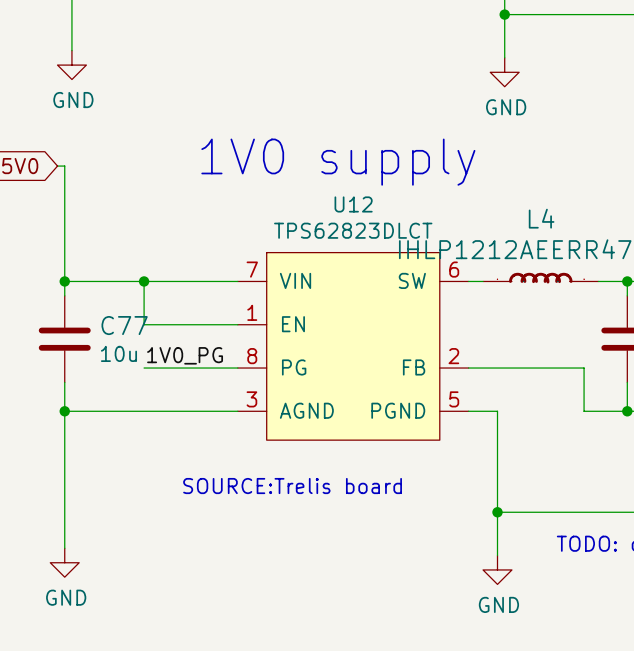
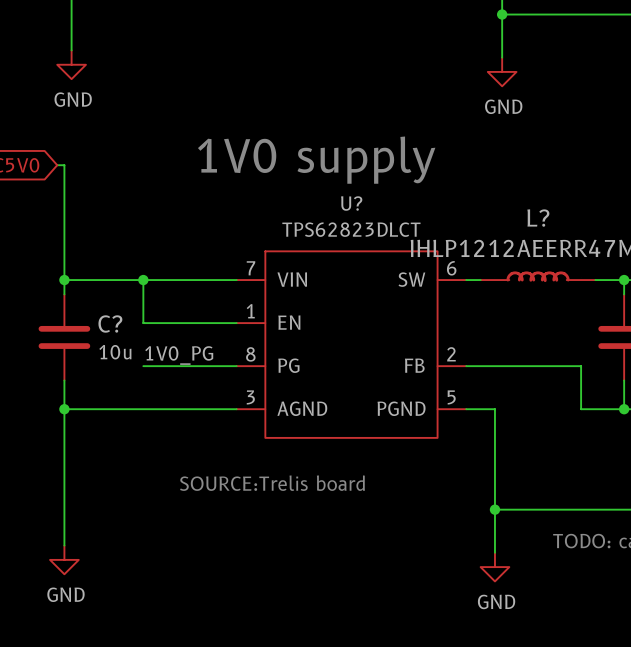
U12 name: U12 (353, 204) -> U? (351, 203)
L4 name: L4 (541, 218) -> L? (538, 218)
C77 name: C77 (124, 325) -> C? (110, 324)

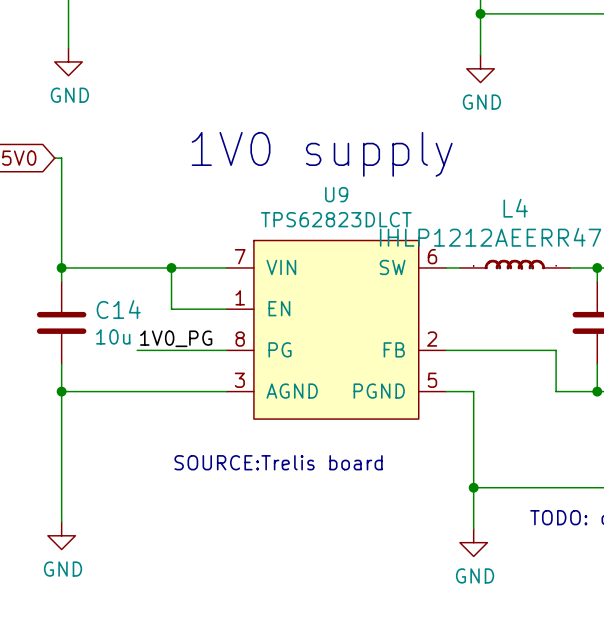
U? name: U? (351, 203) -> U9 (336, 194)
L? name: L? (538, 218) -> L4 (515, 208)
wire: (143, 280) (143, 323) (179, 323) -> (171, 267) (171, 309)
junction position: (143, 280) -> (171, 267)
C? name: C? (110, 324) -> C14 (118, 309)

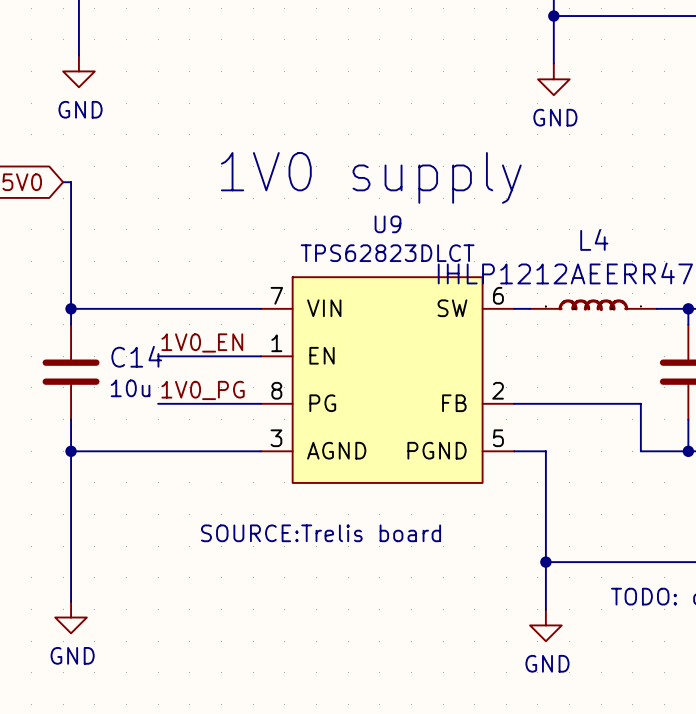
wire: (171, 267) (171, 309) -> (158, 356) (197, 356)
junction: (171, 267) -> none
label: none -> 1V0_EN (202, 342)

